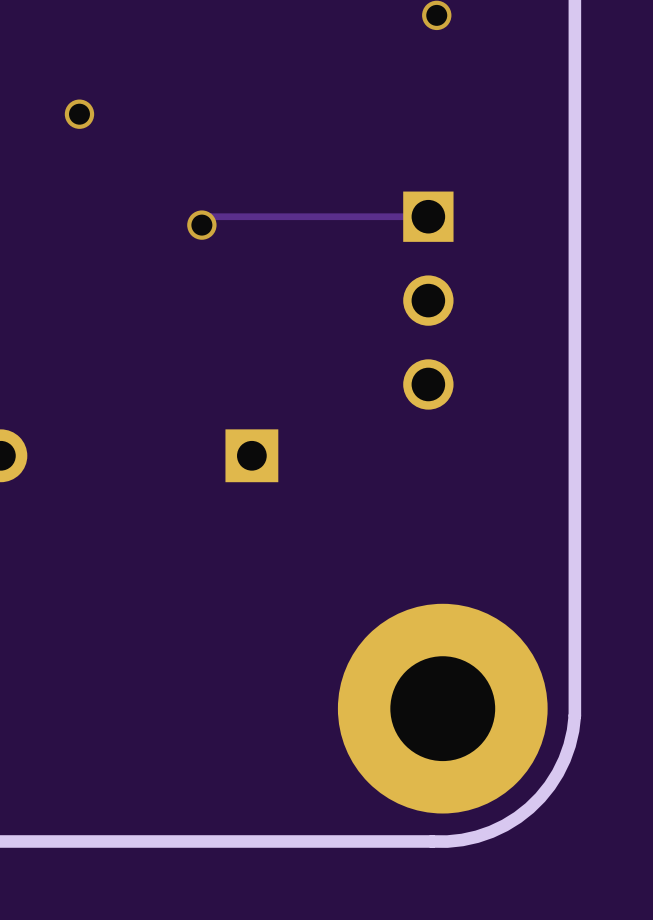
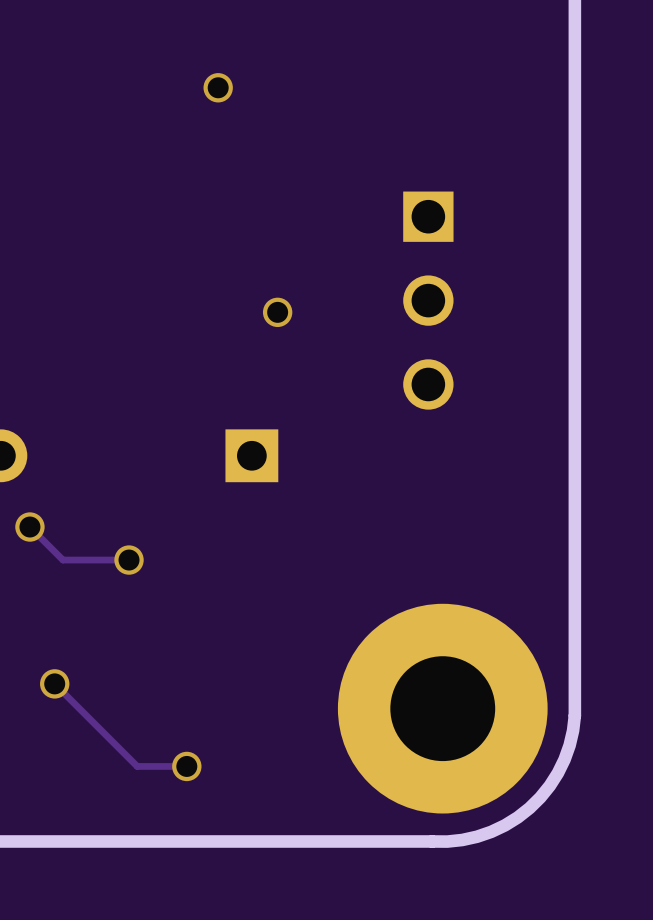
via: (436, 15) -> none
via: none -> (218, 87)
via: (79, 114) -> none
track: (428, 216) (210, 216) (201, 225) -> none
via: (201, 225) -> none
via: none -> (277, 312)
track: none -> (29, 527) (62, 560) (129, 560)
via: none -> (29, 527)
via: none -> (129, 560)
track: none -> (54, 683) (137, 766) (186, 766)
via: none -> (54, 683)
via: none -> (186, 766)

